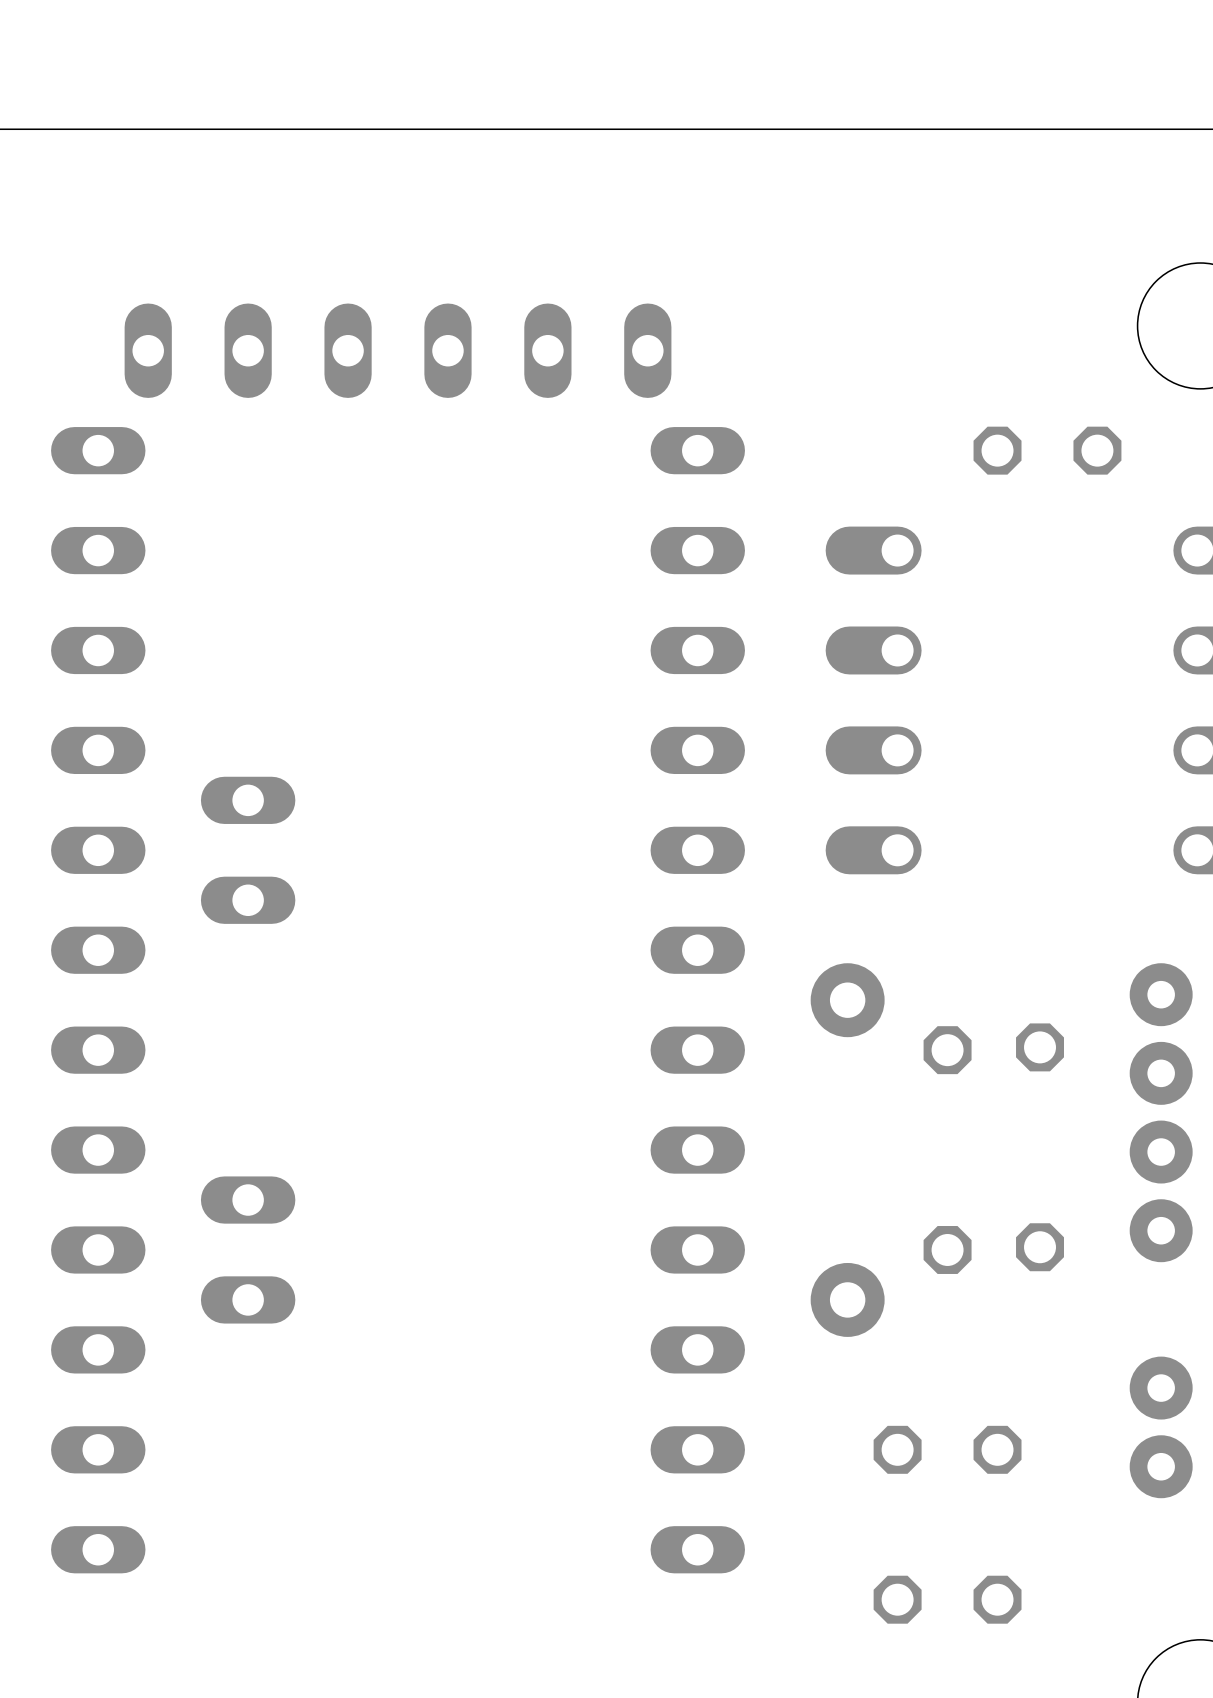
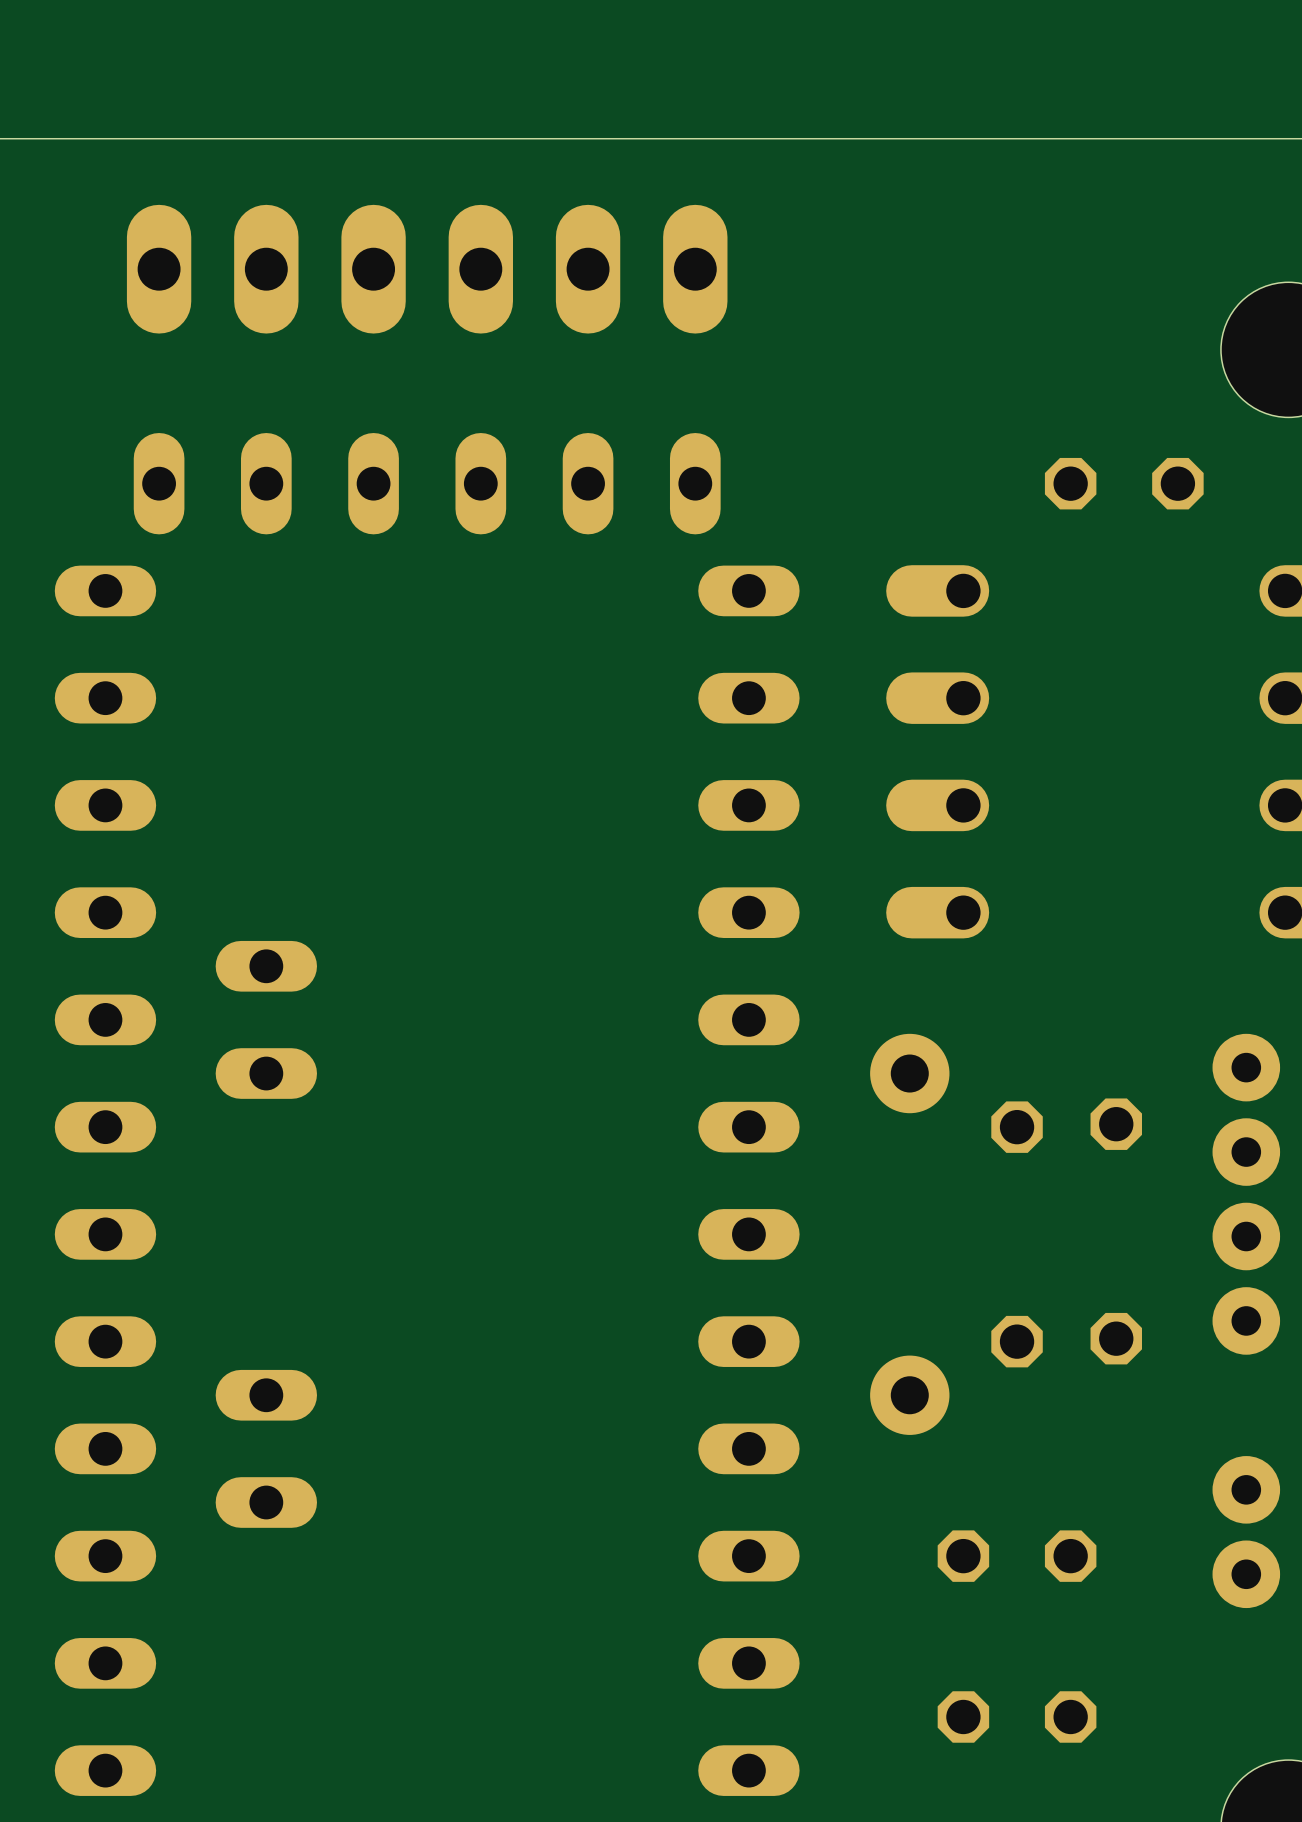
part: none -> (427, 269)
part position: (398, 938) -> (427, 1114)

